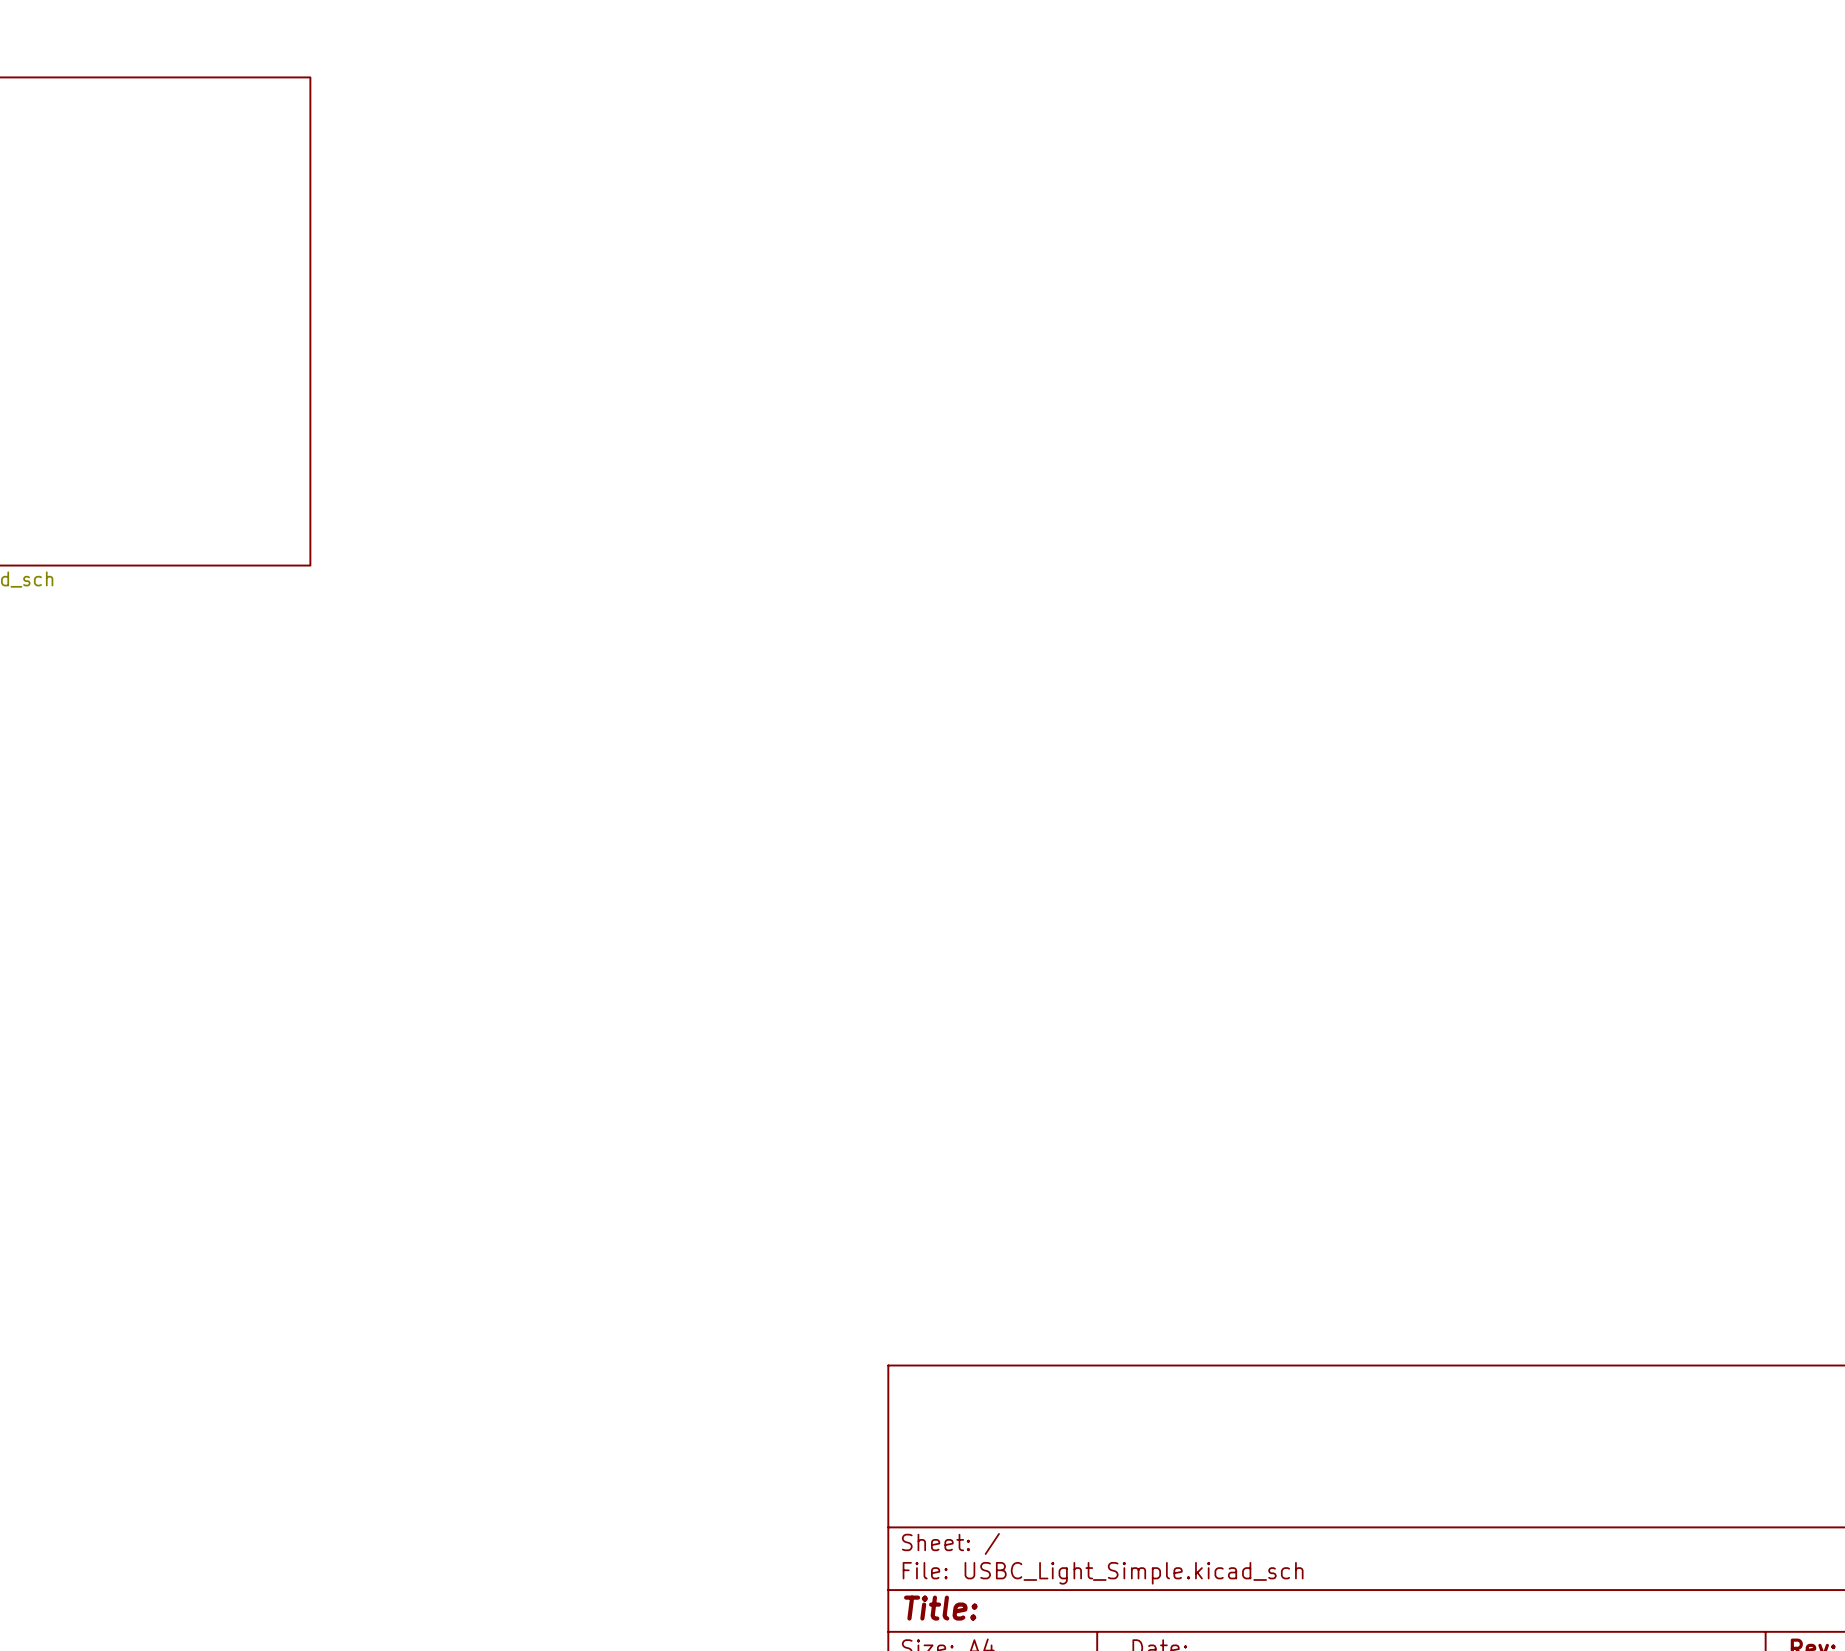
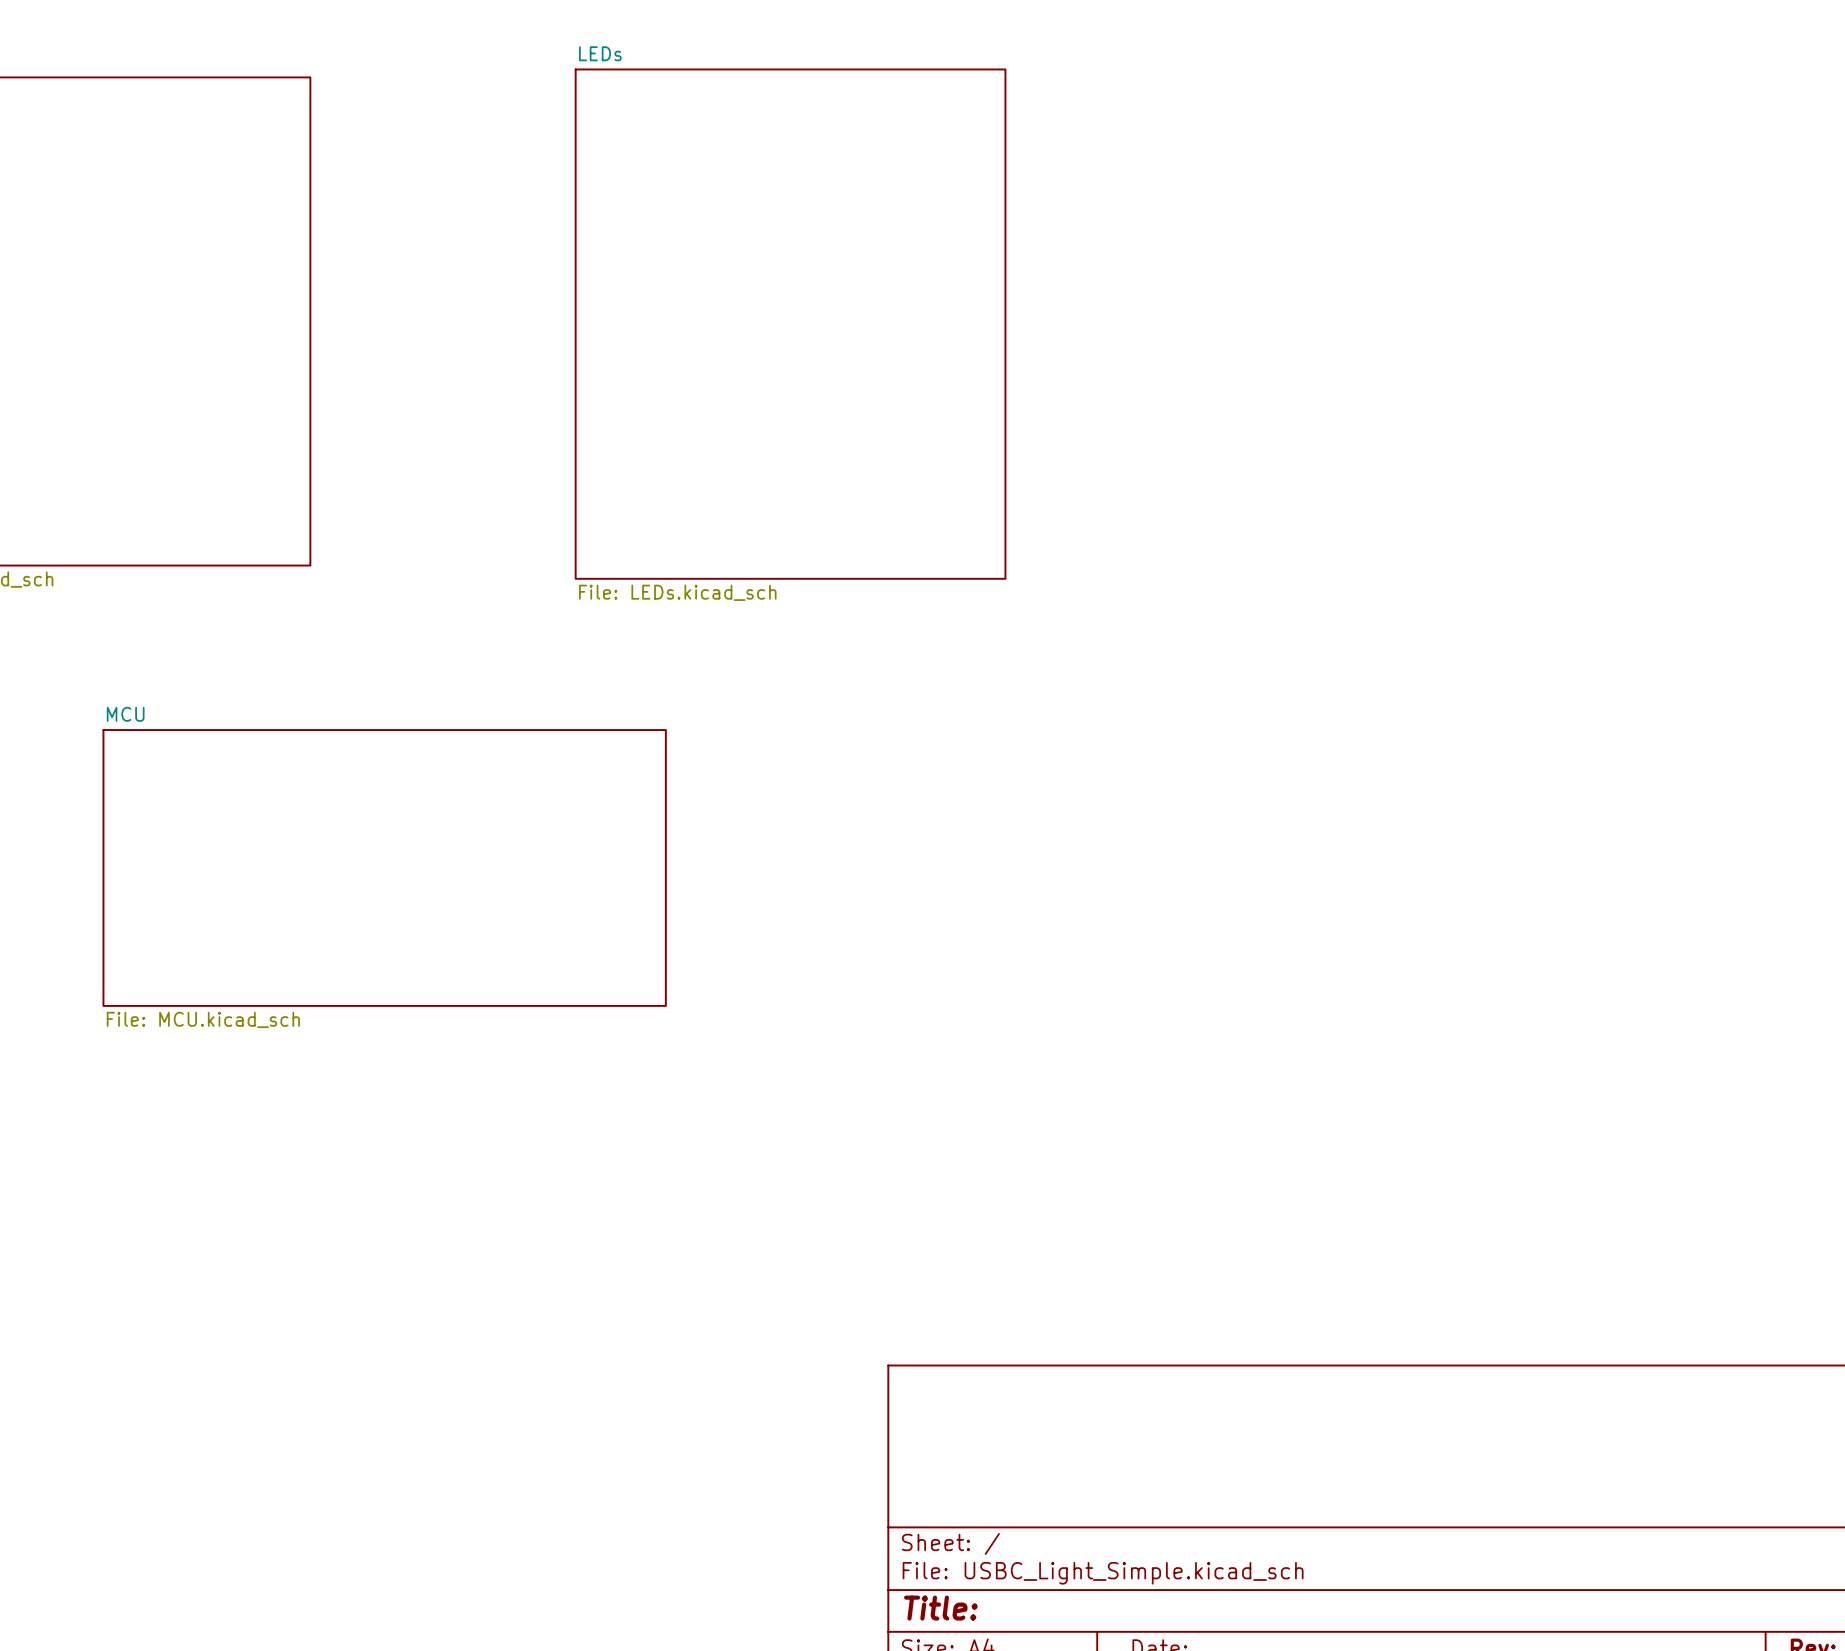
sheet LEDs: none -> File: LEDs.kicad_sch (790, 324)
sheet MCU: none -> File: MCU.kicad_sch (384, 867)

